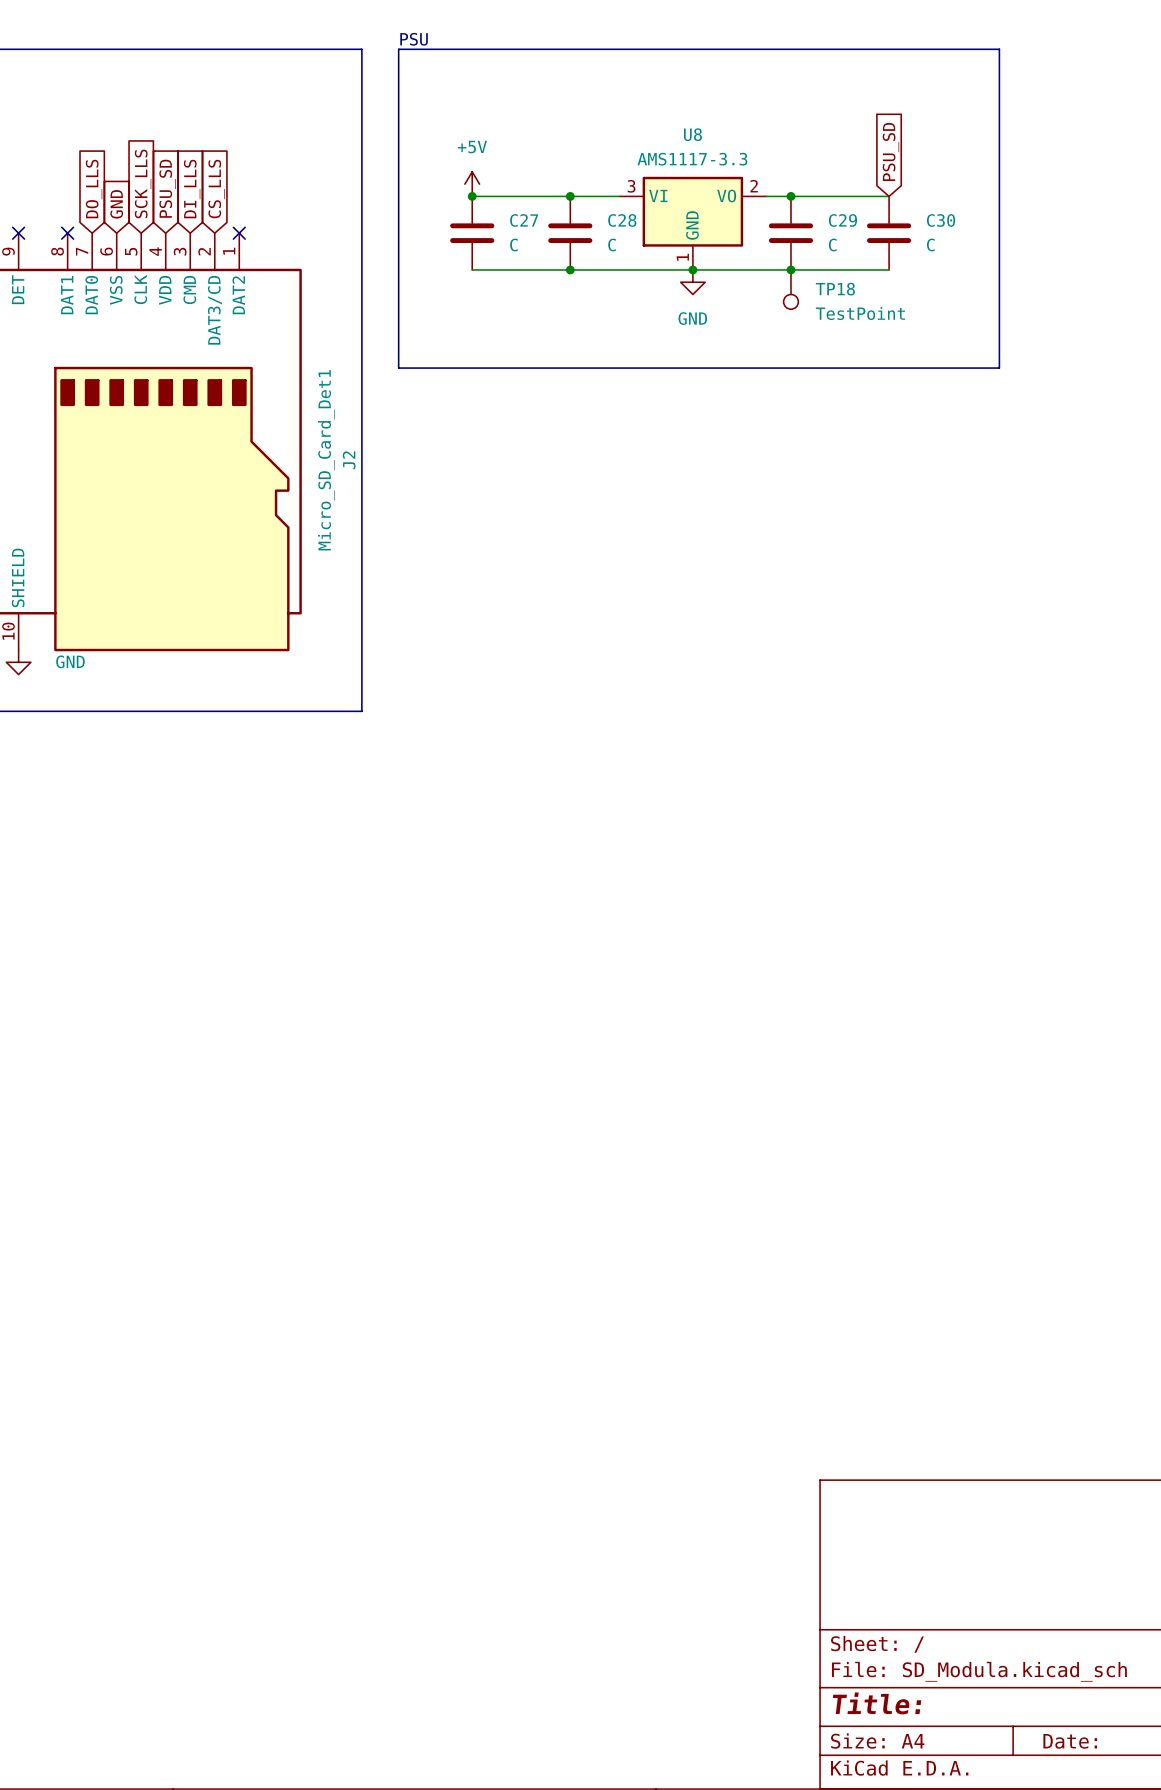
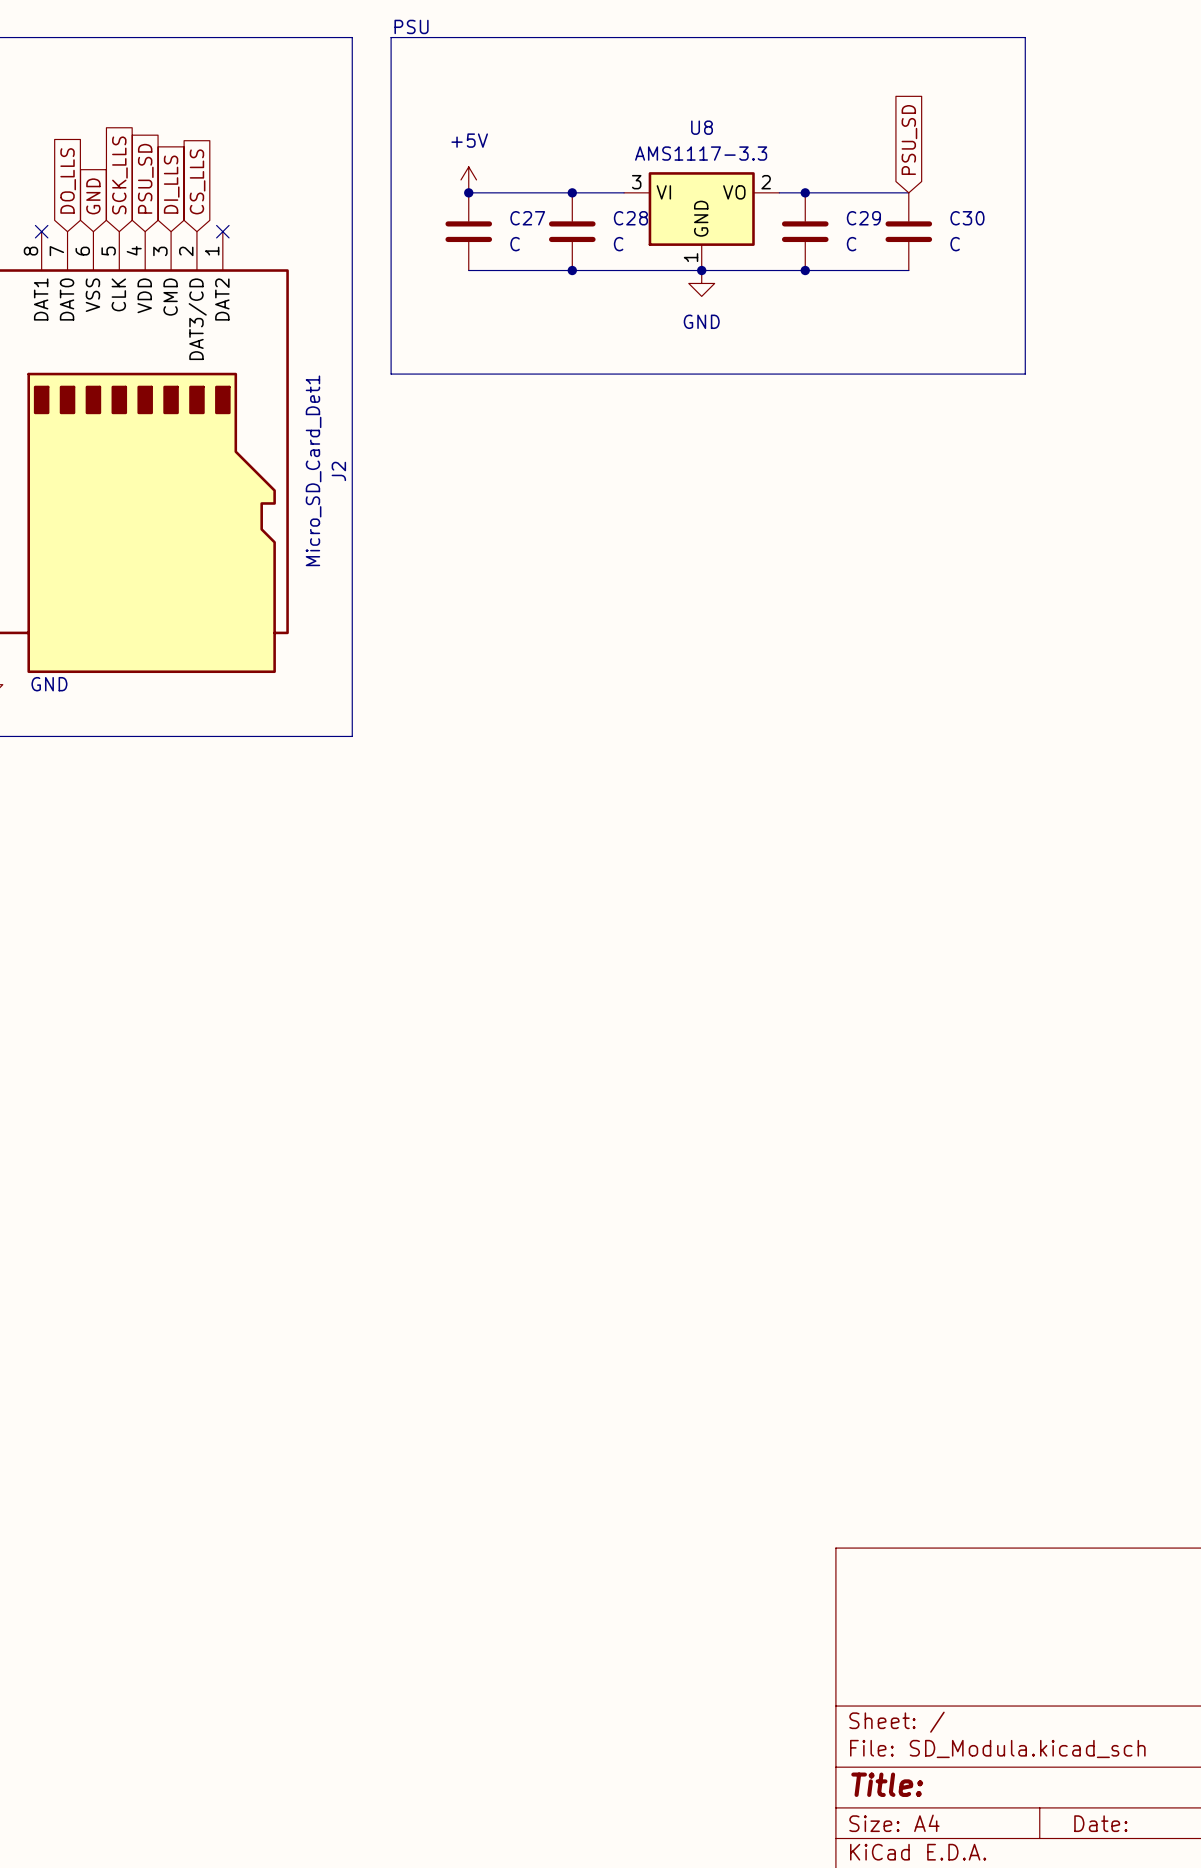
TP18: TestPoint (790, 289) -> none

